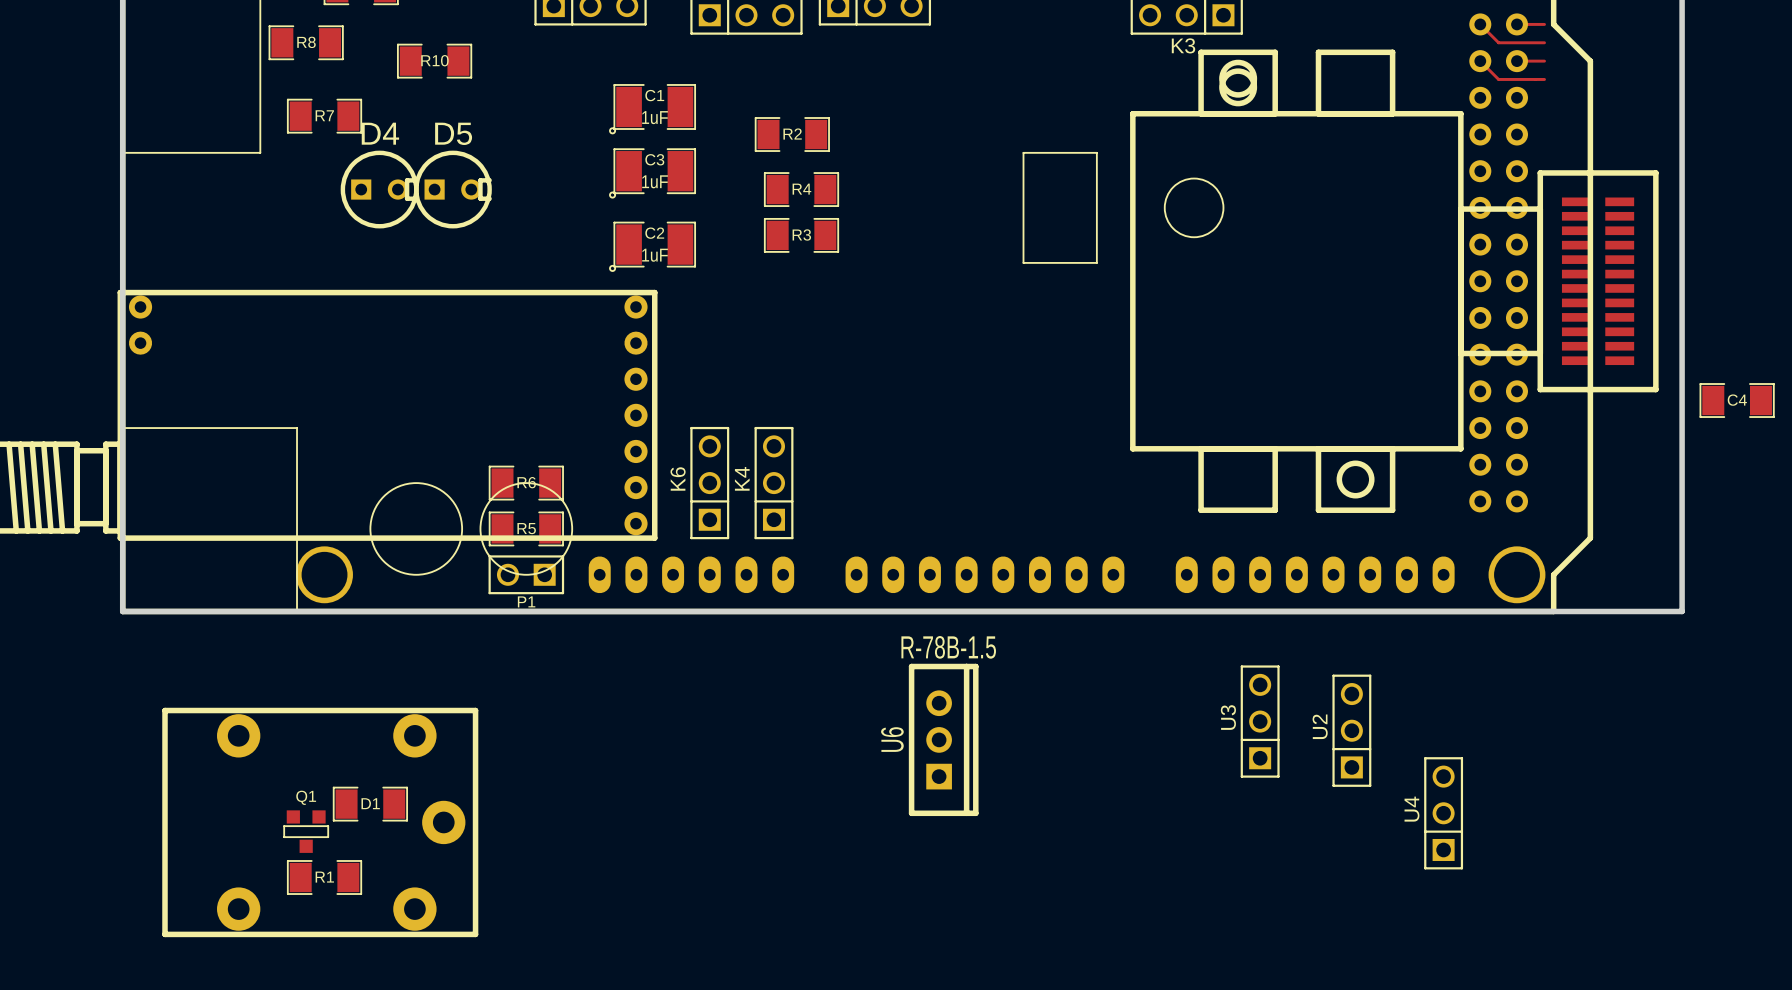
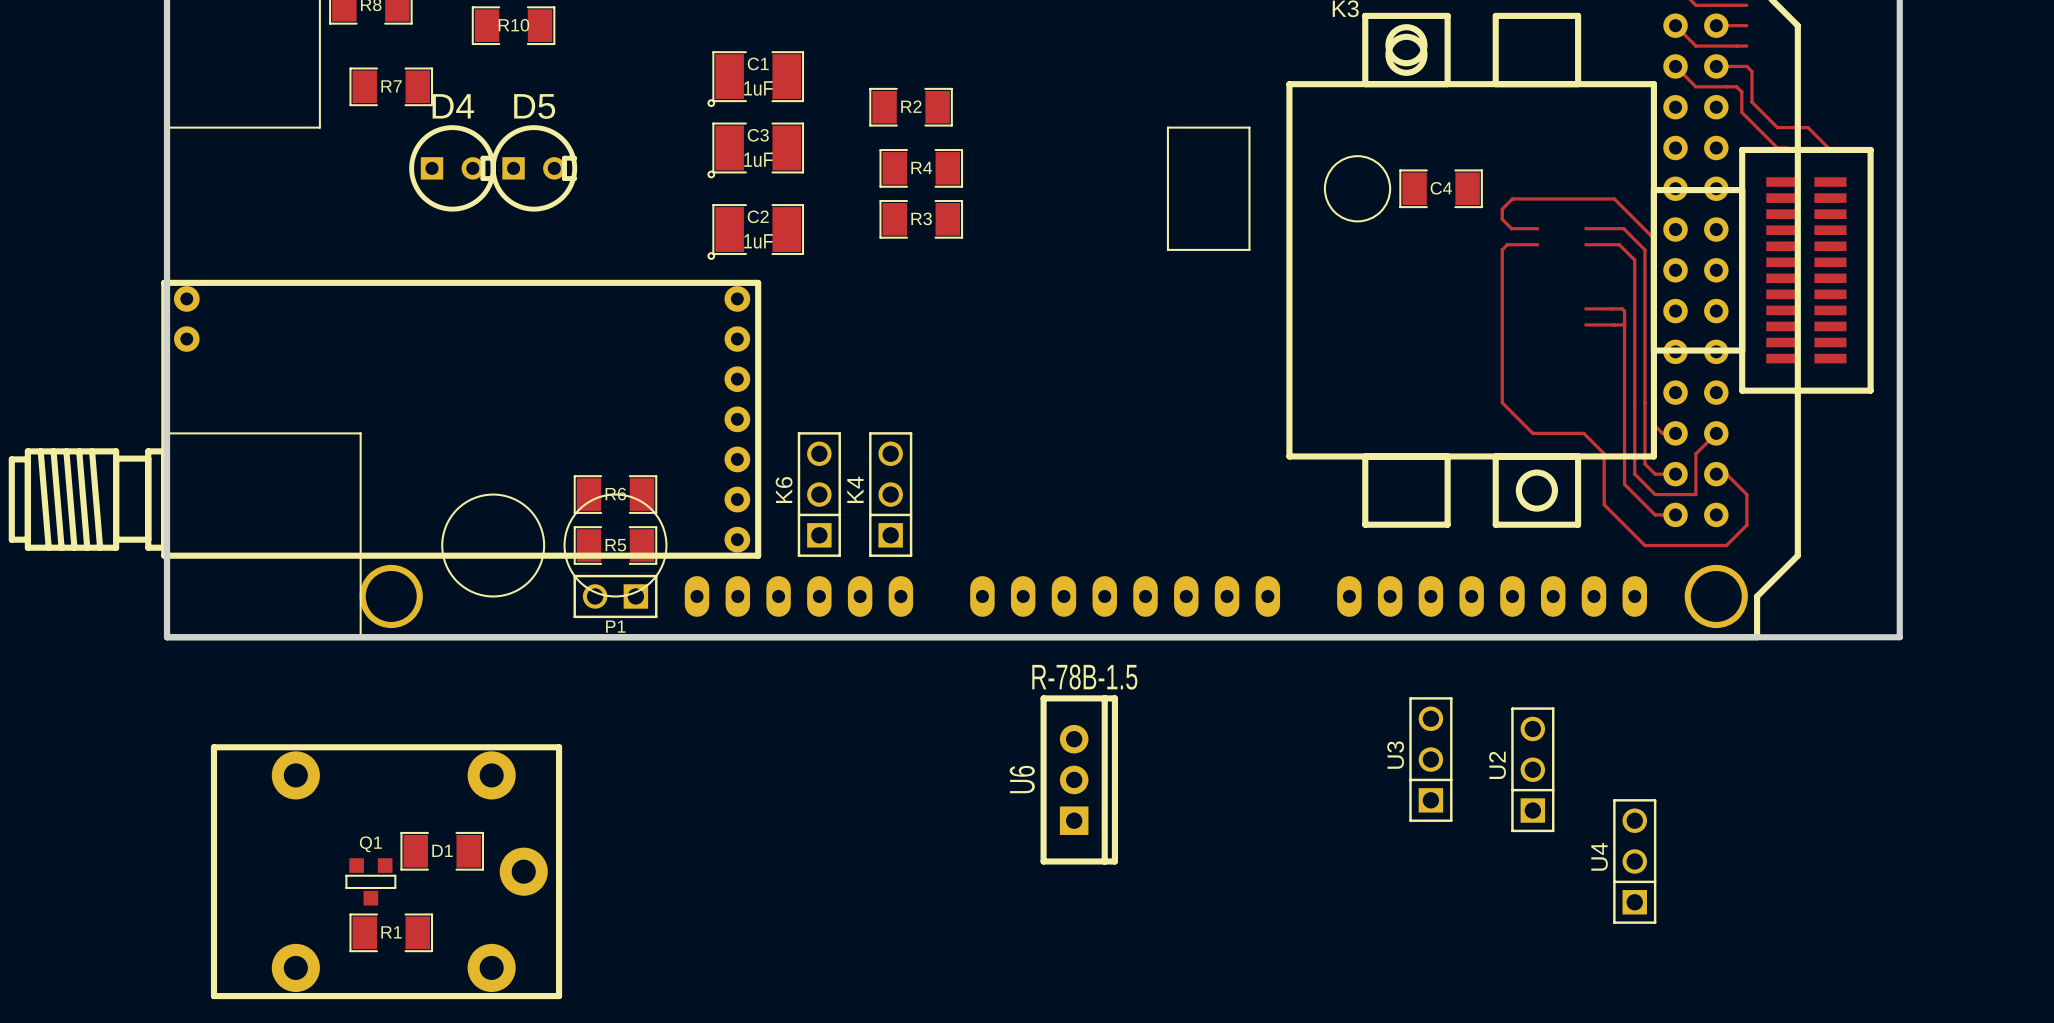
track: none -> (1675, 66) (1695, 86) (1736, 86) (1741, 91) (1741, 112) (1777, 147) (1787, 147)
track: none -> (1716, 66) (1746, 66) (1751, 71) (1751, 102) (1777, 127) (1808, 127) (1828, 147)
track: none -> (1537, 228) (1511, 228) (1502, 219) (1502, 209) (1512, 198) (1614, 198) (1655, 239) (1655, 425) (1662, 433) (1675, 433)
track: none -> (1585, 228) (1623, 228) (1644, 249) (1644, 463) (1655, 474) (1675, 474)
track: none -> (1537, 244) (1507, 244) (1502, 249) (1502, 402) (1532, 433) (1583, 433) (1604, 453) (1604, 504) (1644, 545) (1726, 545) (1746, 525) (1746, 494) (1726, 474) (1716, 474)
track: none -> (1585, 244) (1619, 244) (1634, 260) (1634, 474) (1655, 494) (1695, 494) (1695, 453) (1716, 433)
track: none -> (1585, 308) (1622, 308) (1624, 311) (1624, 484) (1655, 514) (1675, 514)
track: none -> (1585, 324) (1624, 324)
C4 position: (1737, 400) -> (1441, 188)

